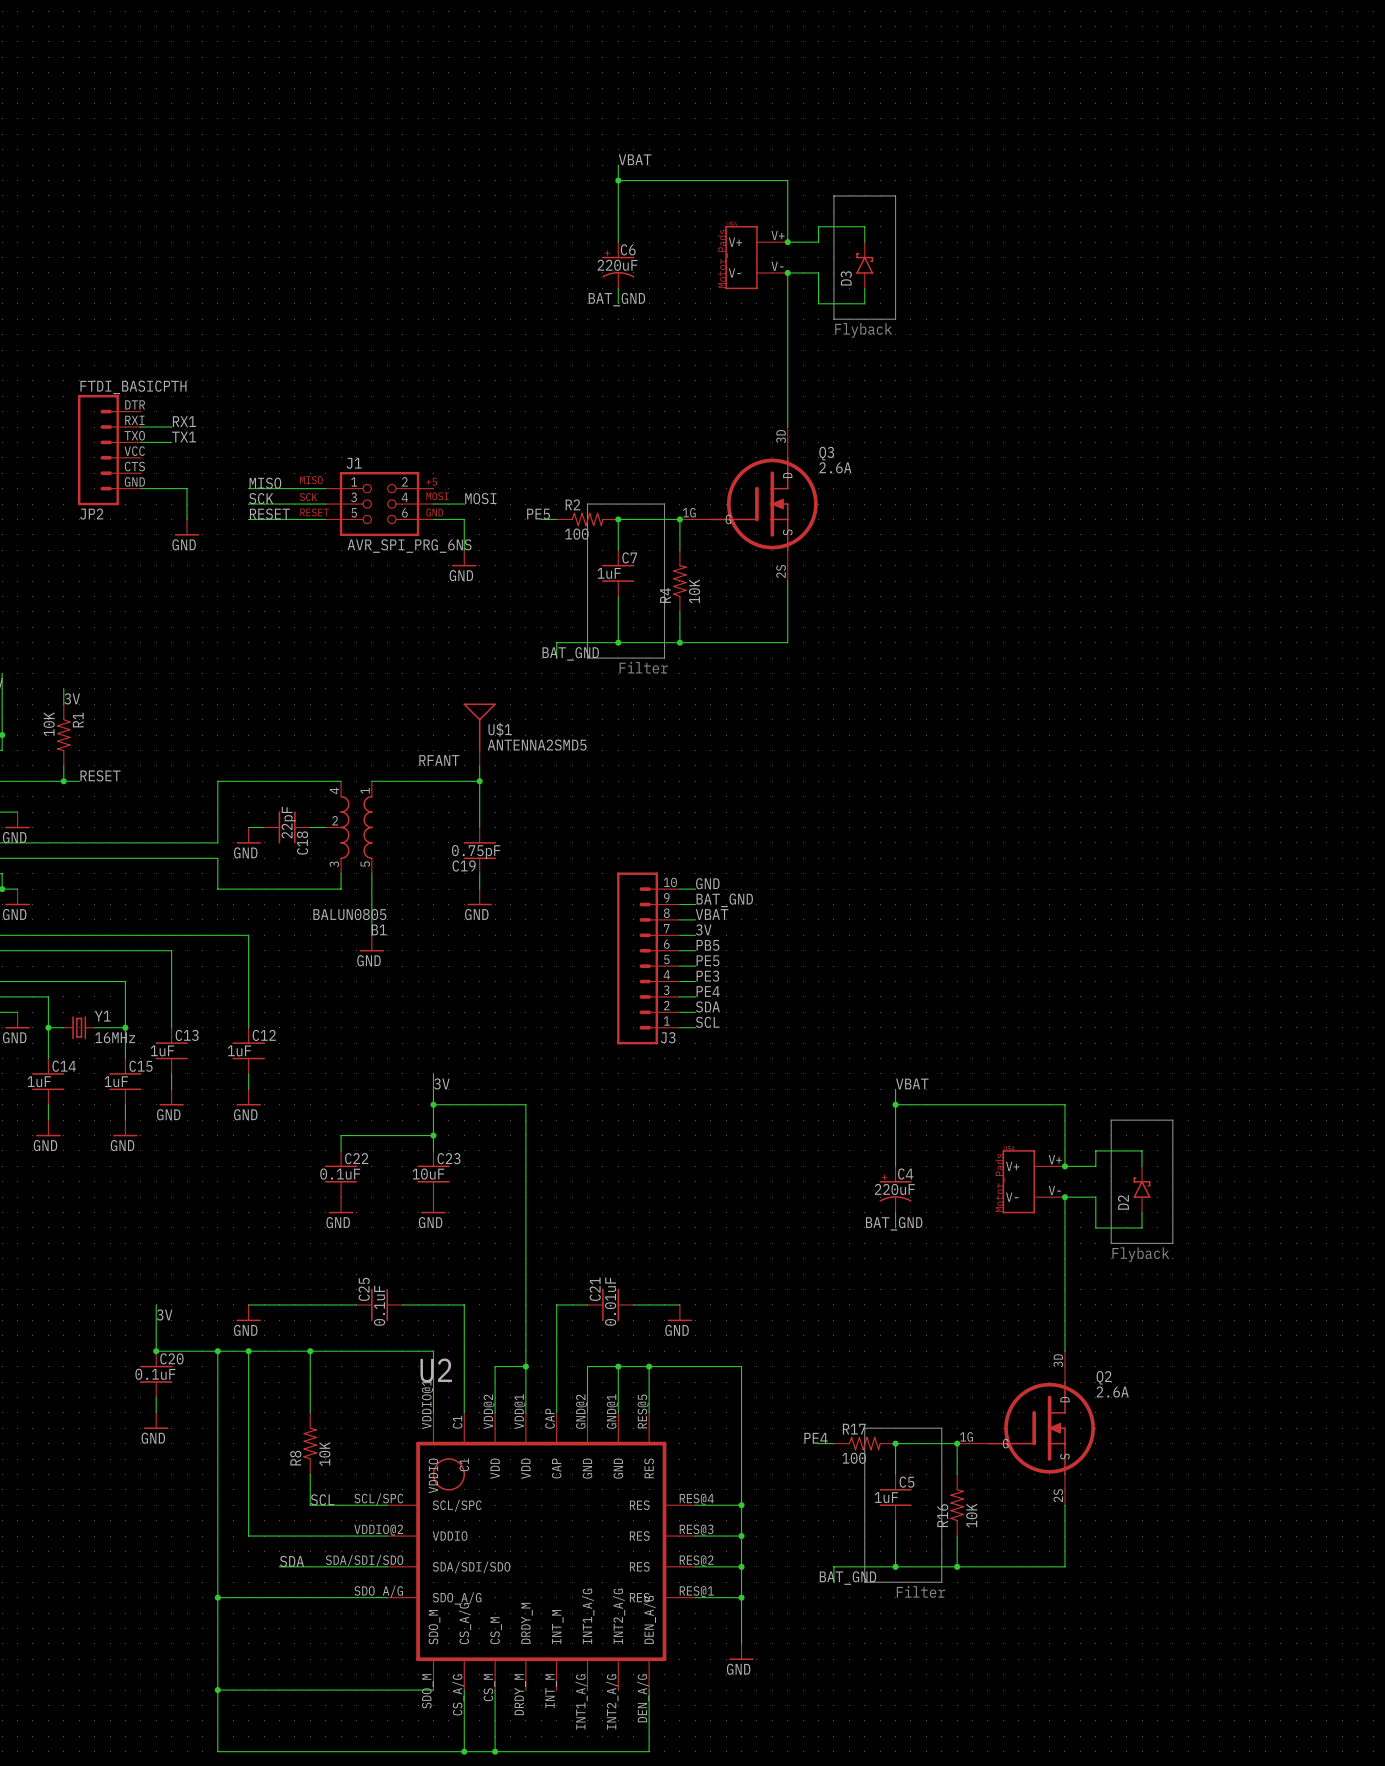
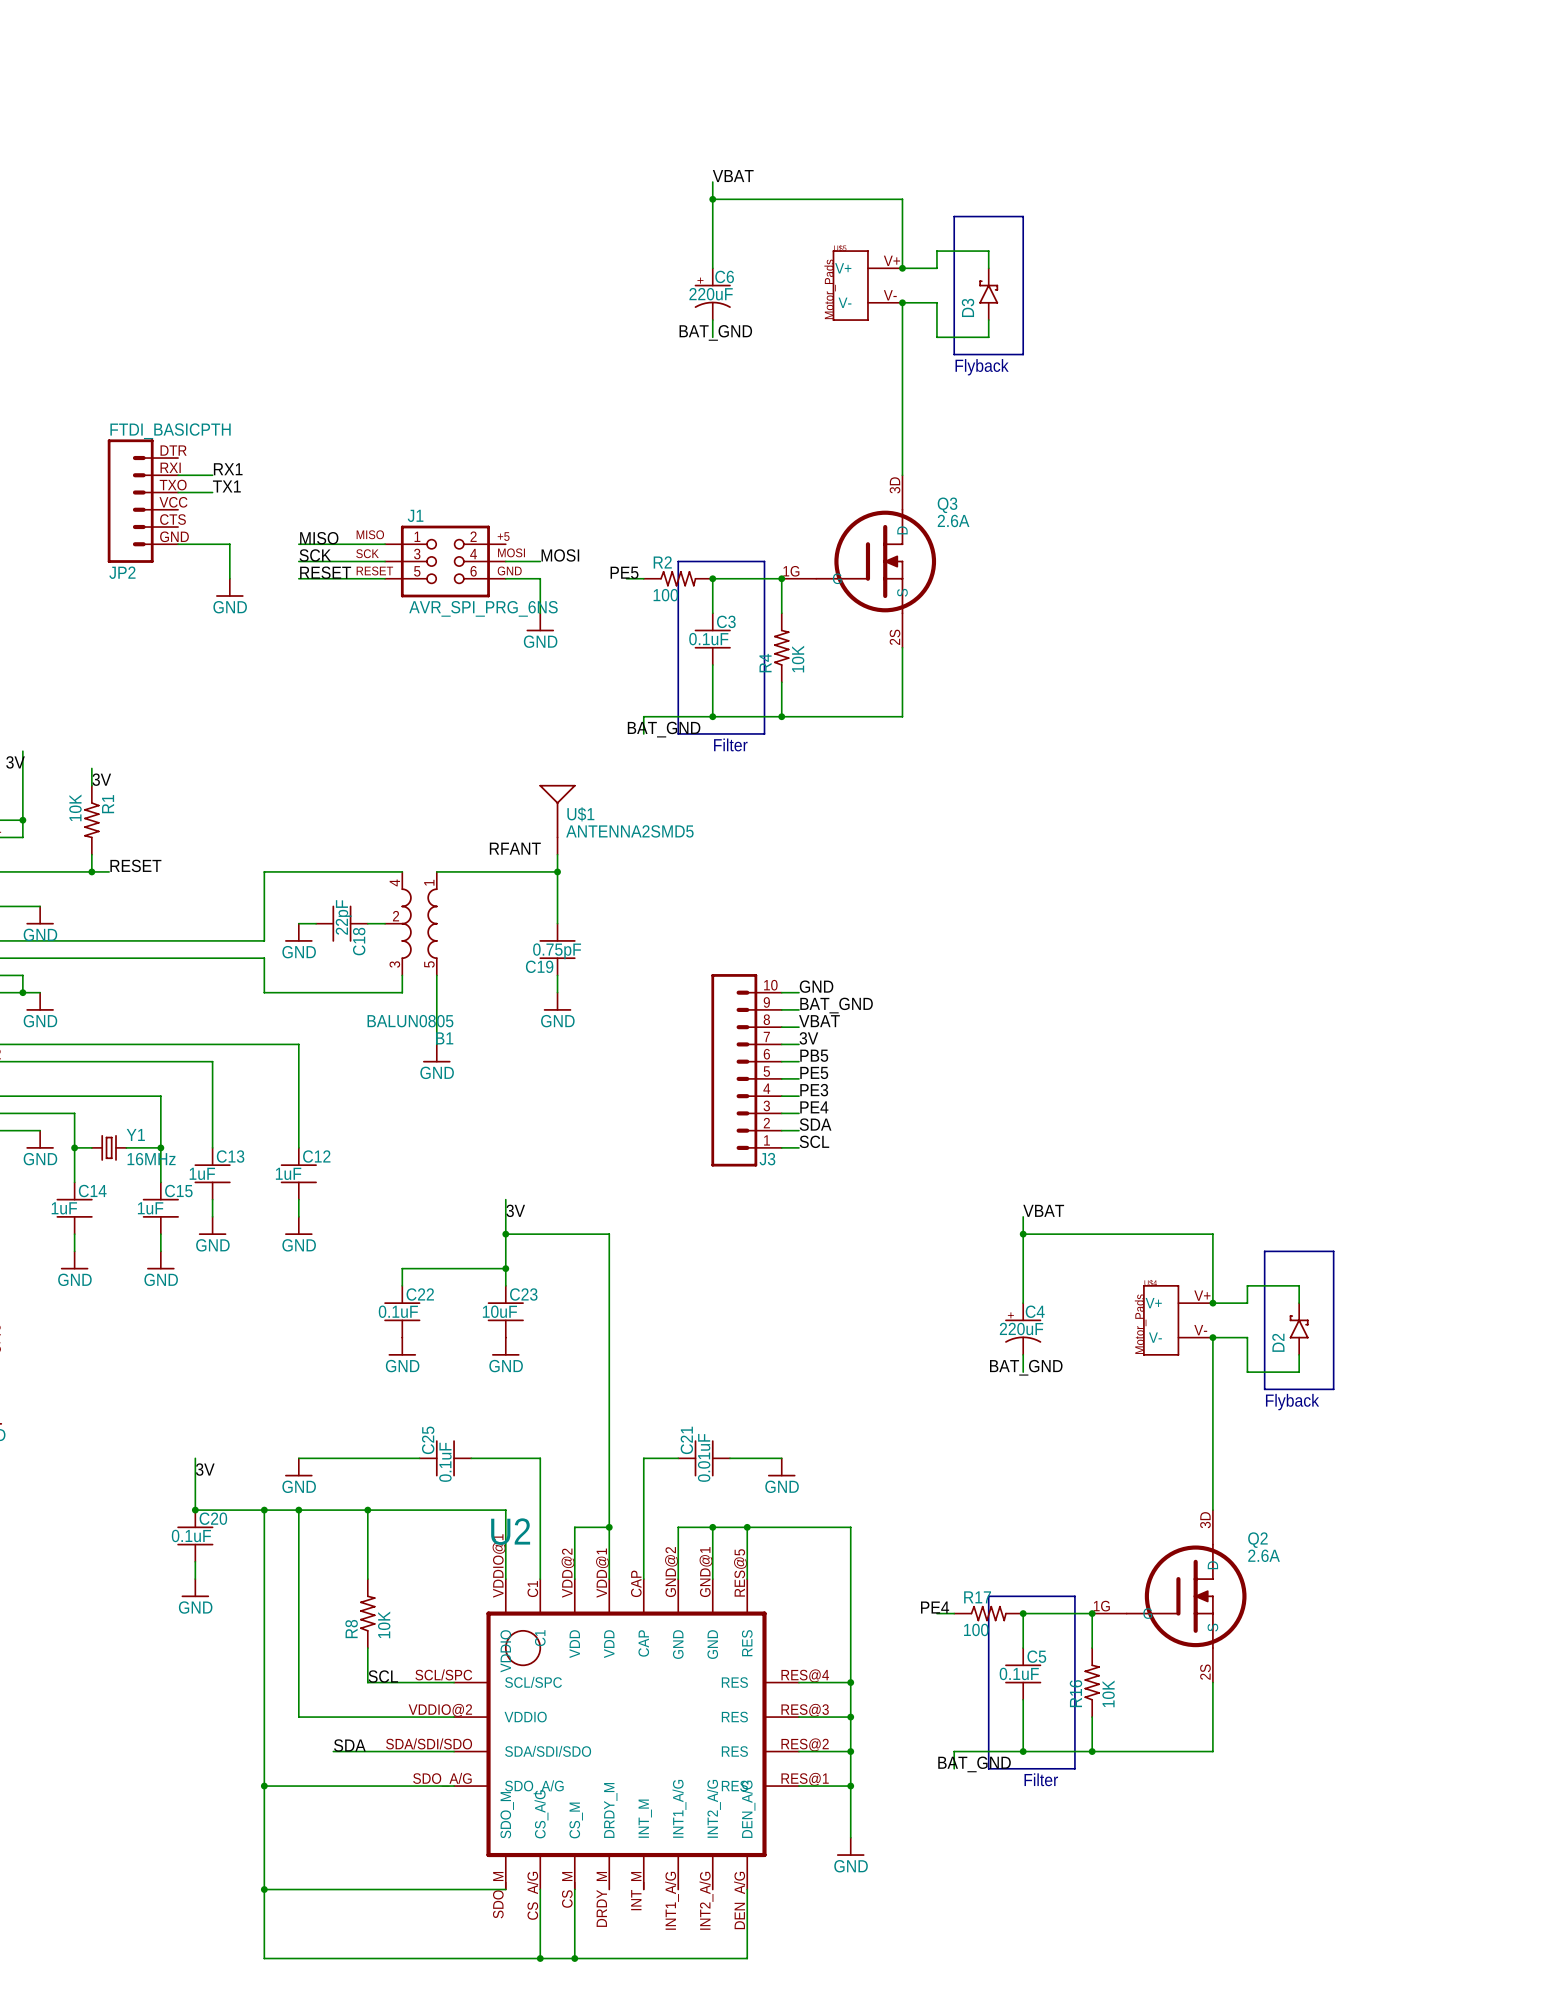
C7 name: C7 (629, 557) -> C3 (726, 621)
C7 value: 1uF (609, 573) -> 0.1uF (708, 639)
C5 value: 1uF (886, 1497) -> 0.1uF (1019, 1673)

